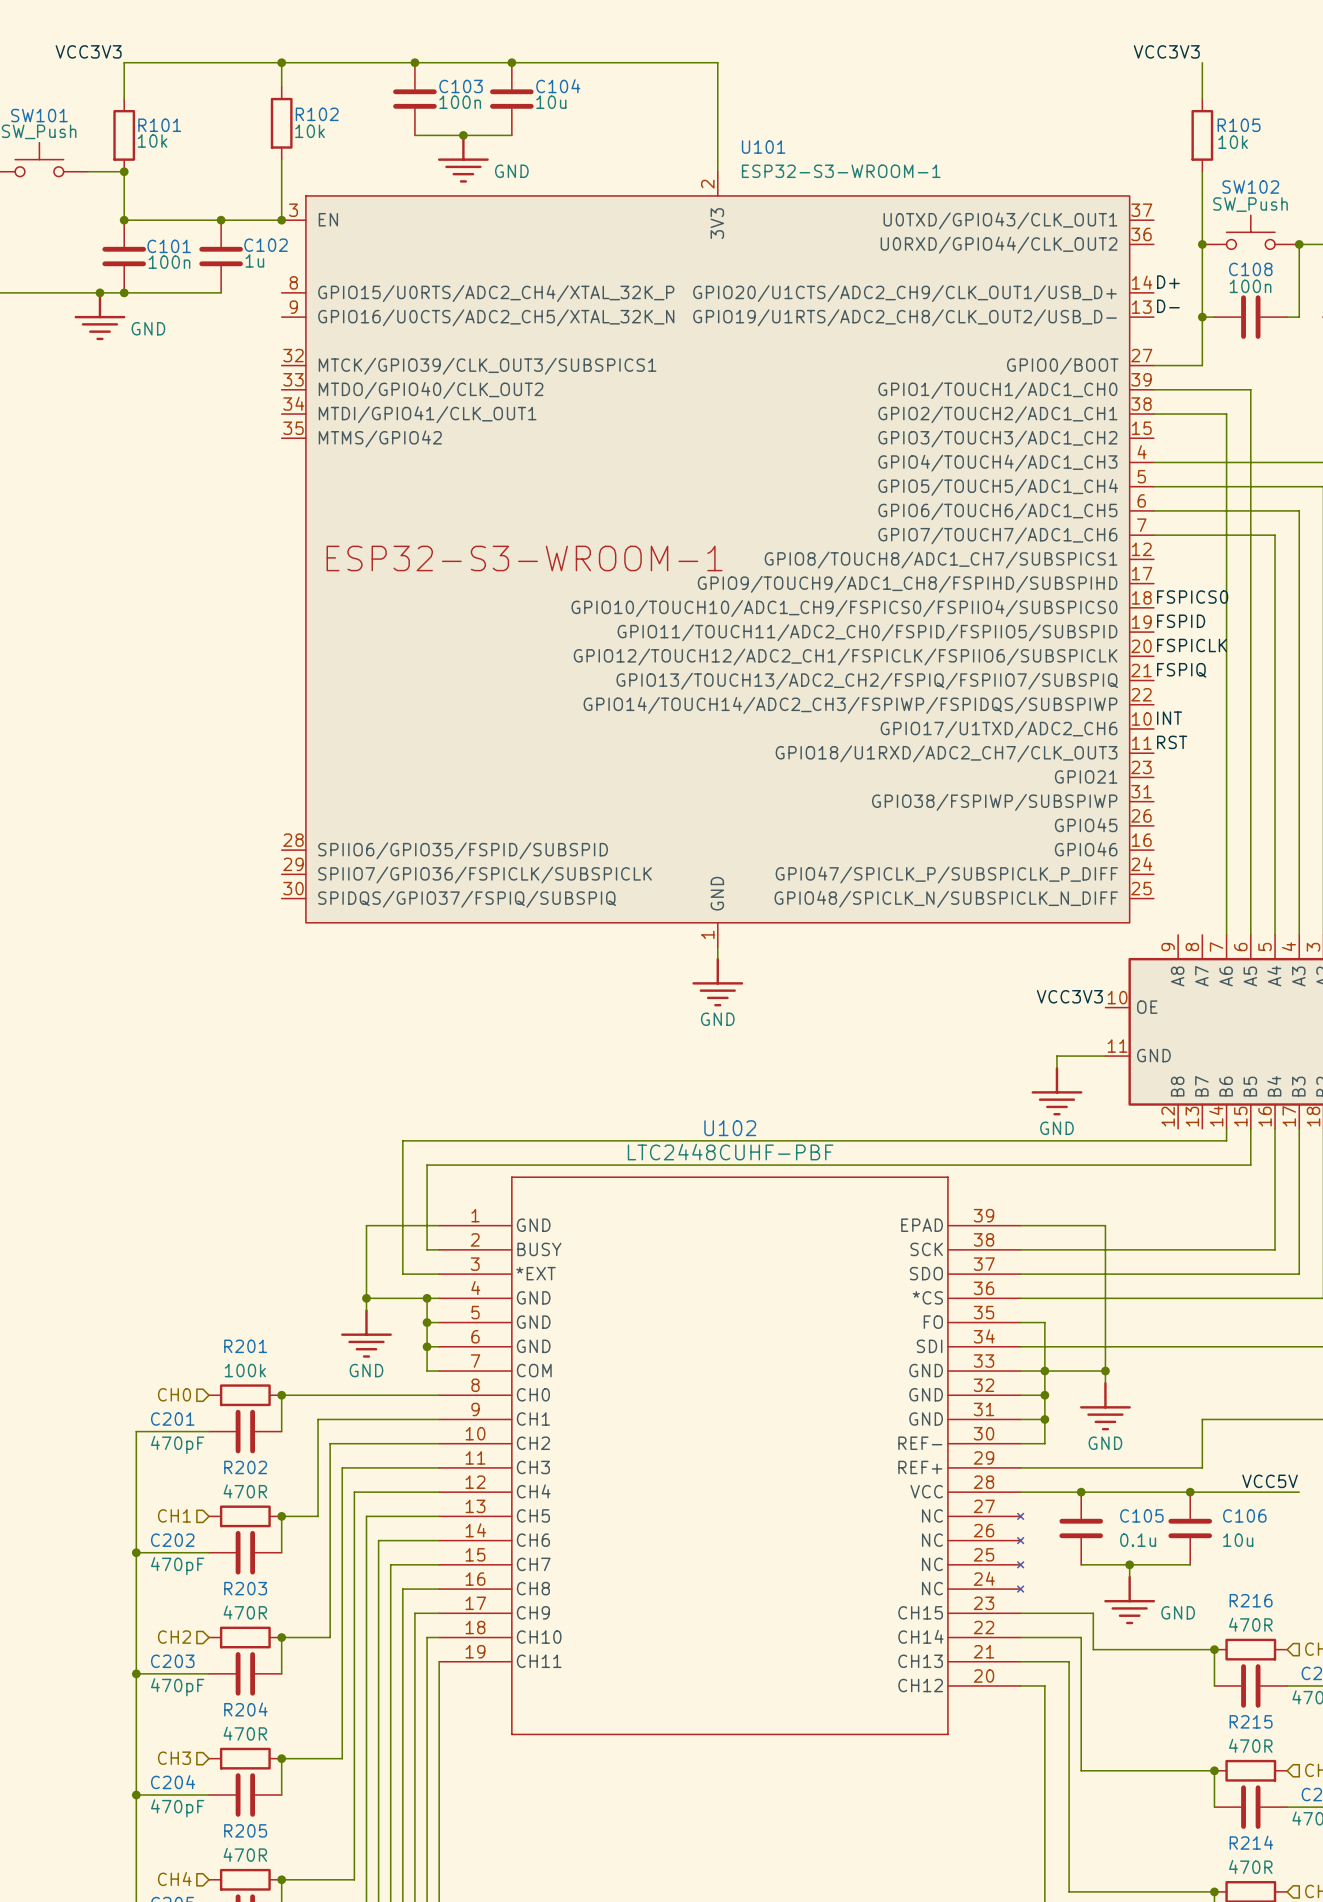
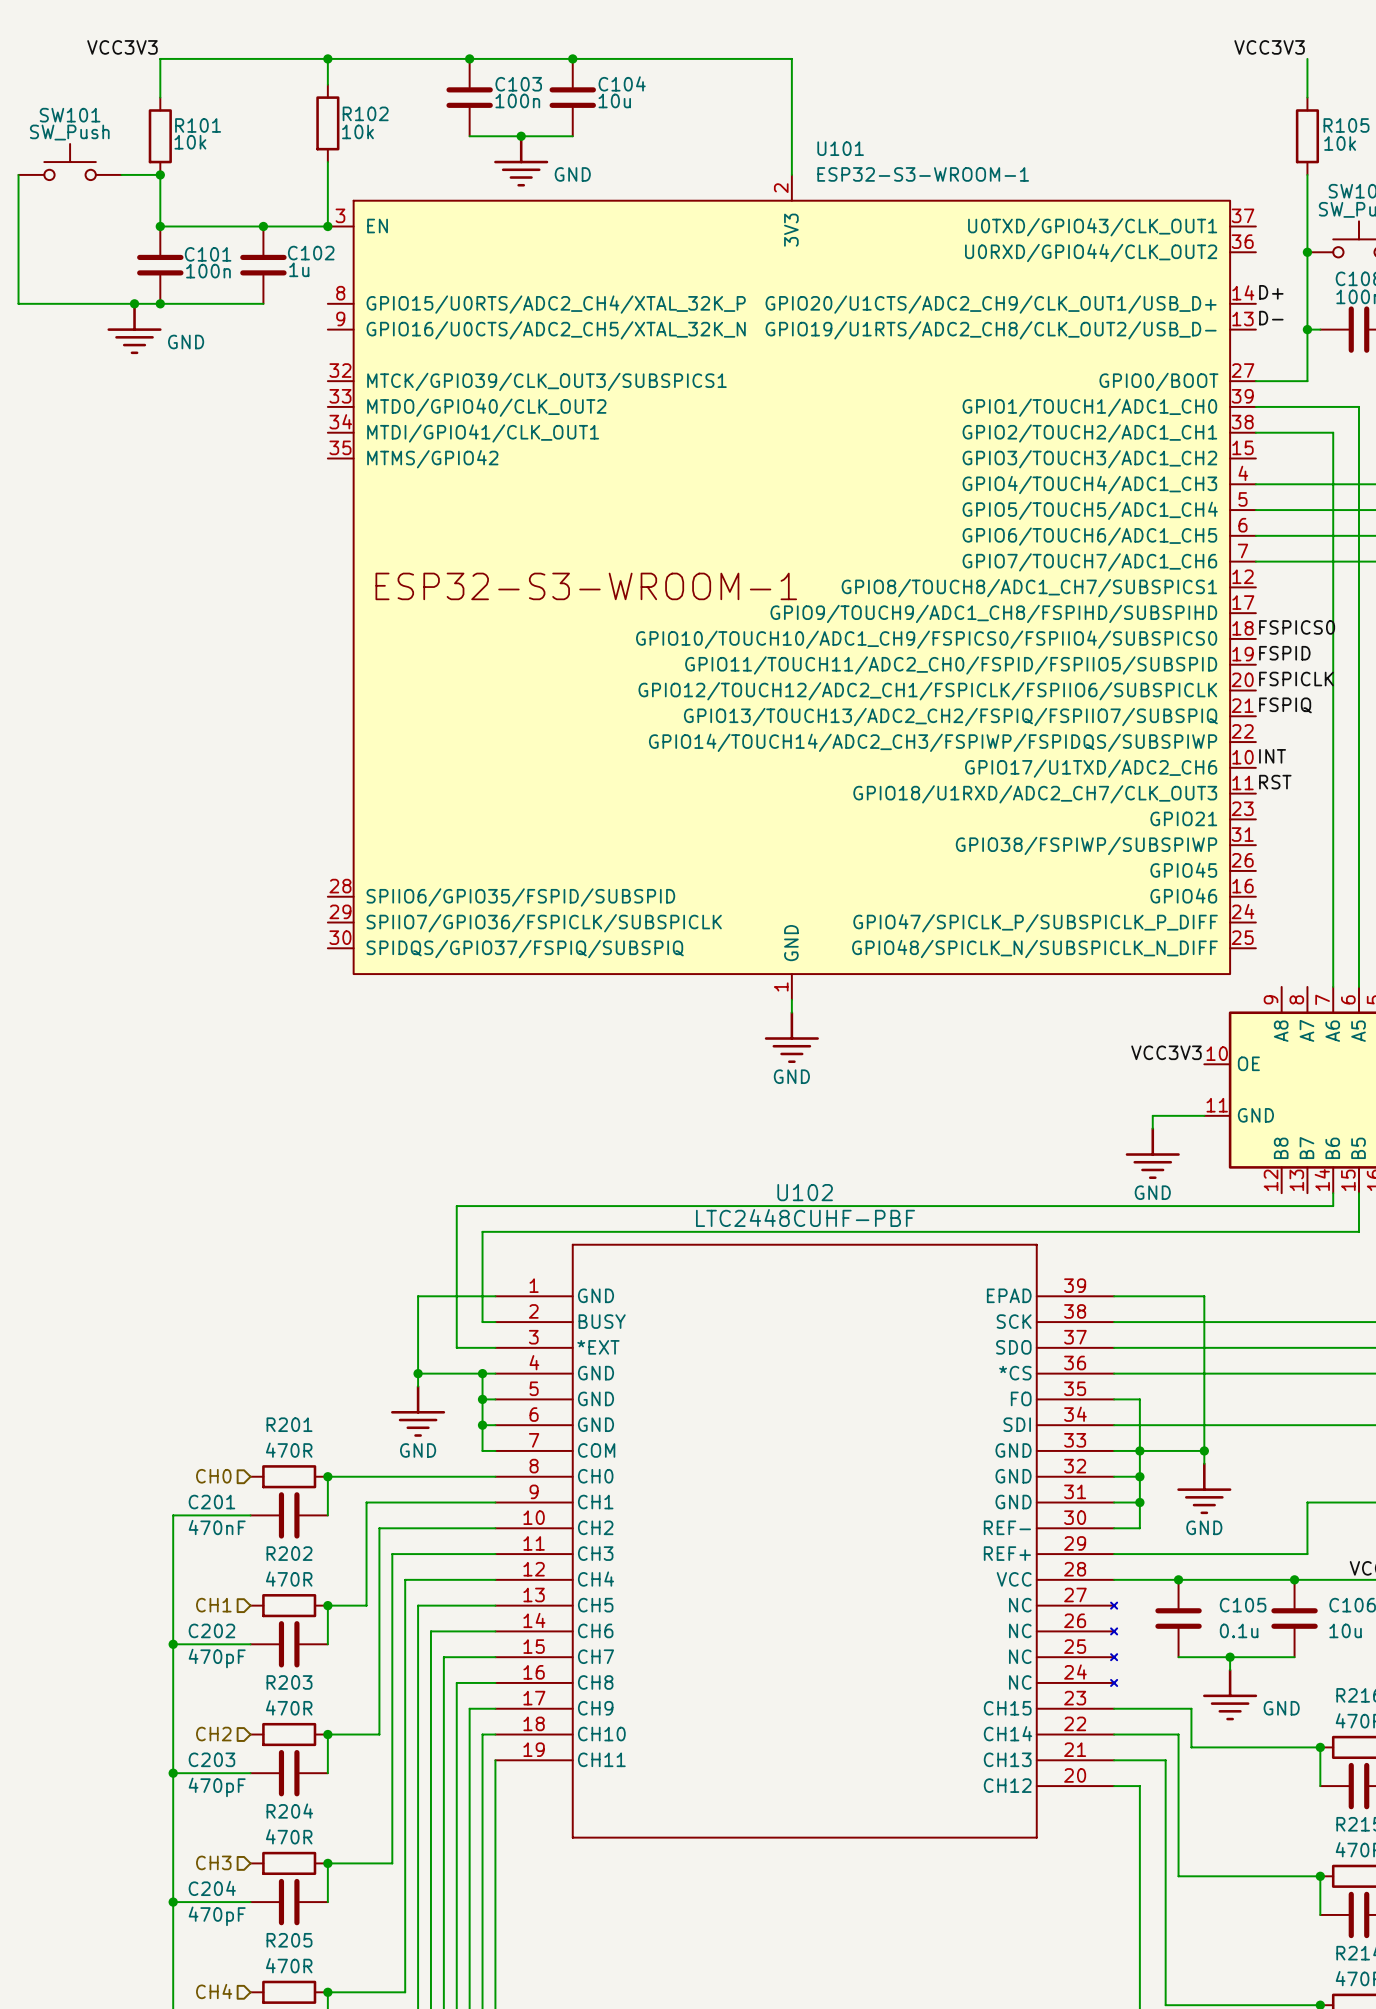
R201 value: 100k (245, 1370) -> 470R (289, 1450)
C201 value: 470pF (177, 1444) -> 470nF (217, 1527)

